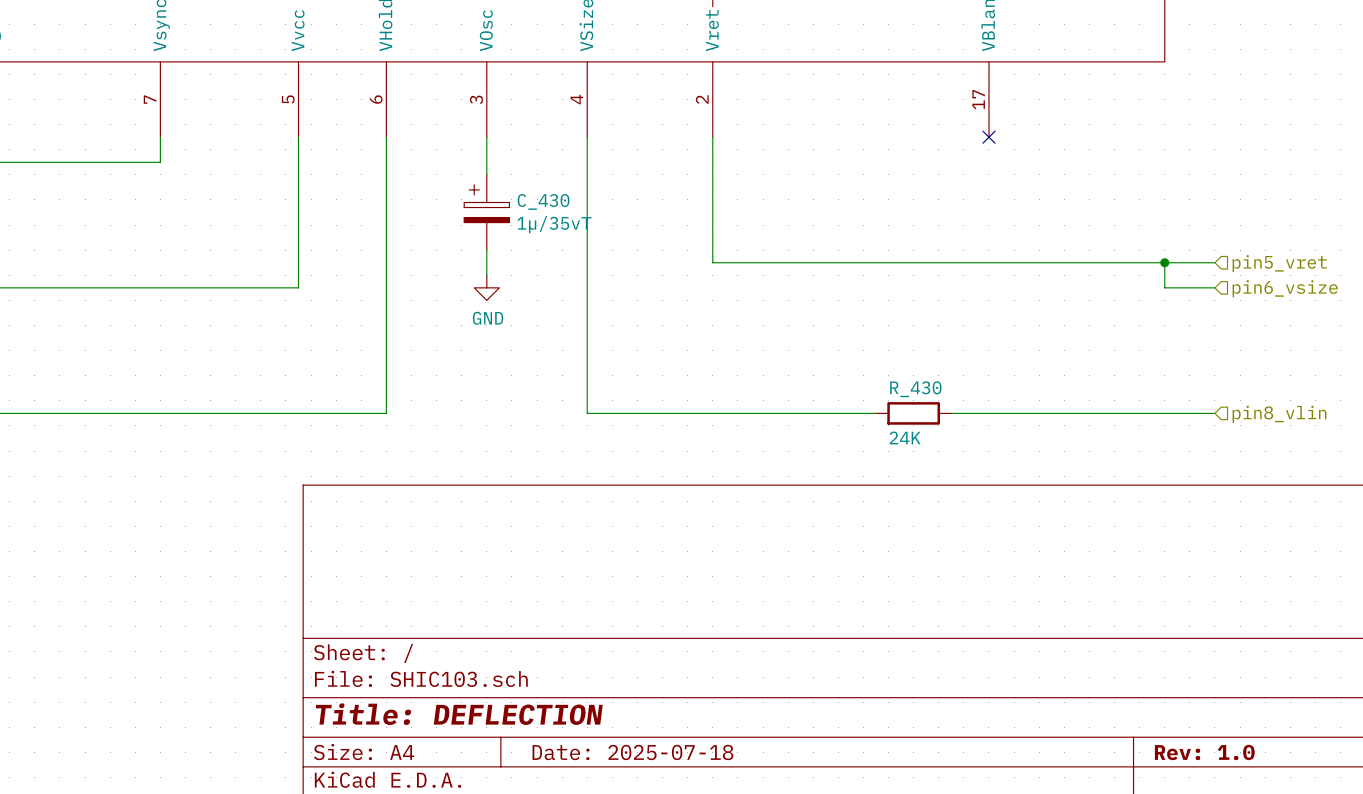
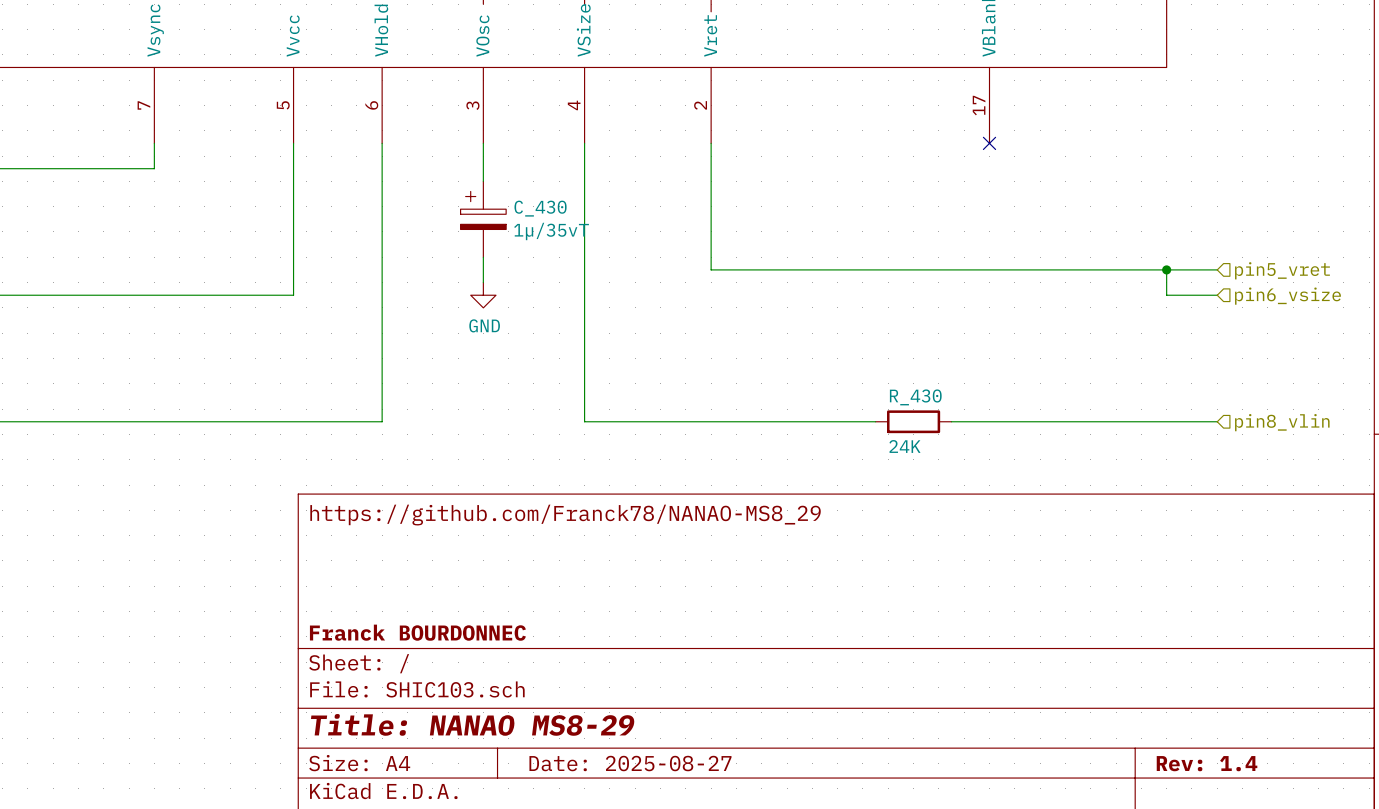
title block: none -> https://github.com/Franck78/NANAO-MS8_29 (565, 515)
title block: none -> Franck BOURDONNEC (417, 632)
title block: Title: DEFLECTION (459, 714) -> Title: NANAO MS8-29 (472, 724)
title block: Date: 2025-07-18 (632, 752) -> Date: 2025-08-27 (630, 763)
title block: Rev: 1.0 (1204, 752) -> Rev: 1.4 (1207, 763)

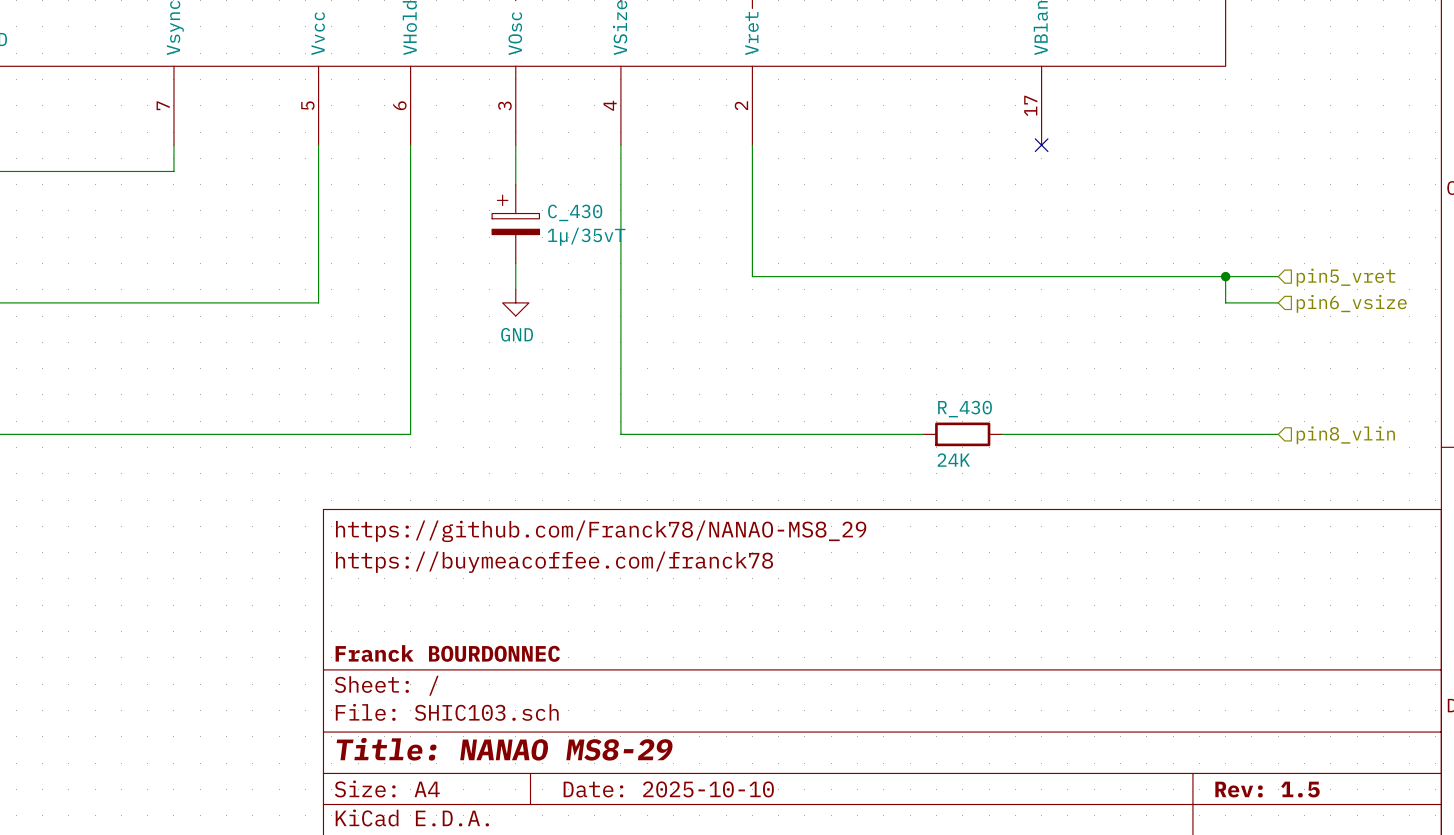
title block: none -> https://buymeacoffee.com/franck78 (554, 562)
title block: Date: 2025-08-27 (630, 763) -> Date: 2025-10-10 (668, 789)
title block: Rev: 1.4 (1207, 763) -> Rev: 1.5 (1267, 789)

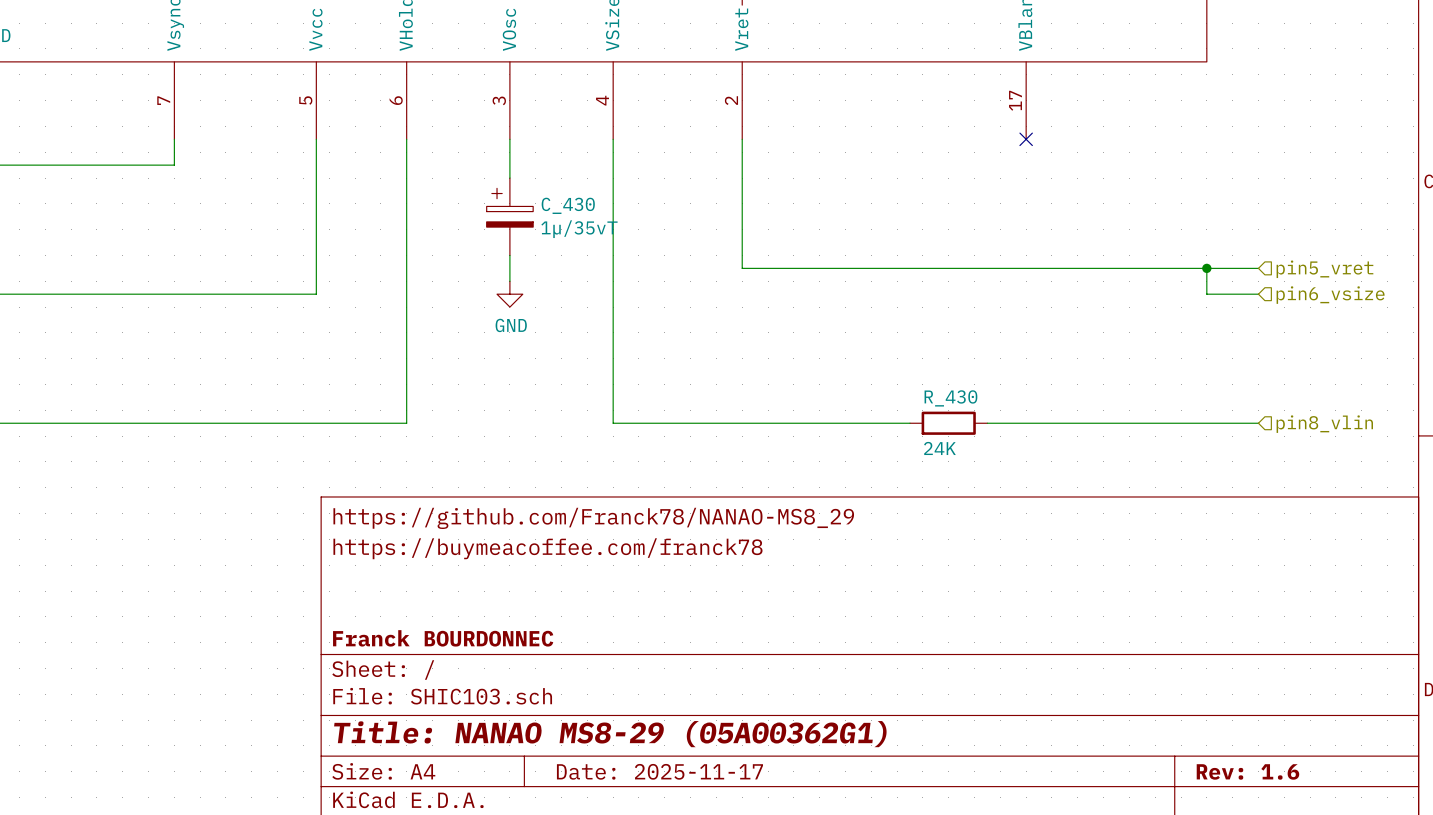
title block: Title: NANAO MS8-29 (504, 749) -> Title: NANAO MS8-29 (05A00362G1) (610, 734)
title block: Date: 2025-10-10 (668, 789) -> Date: 2025-11-17 (659, 771)
title block: Rev: 1.5 (1267, 789) -> Rev: 1.6 (1247, 771)

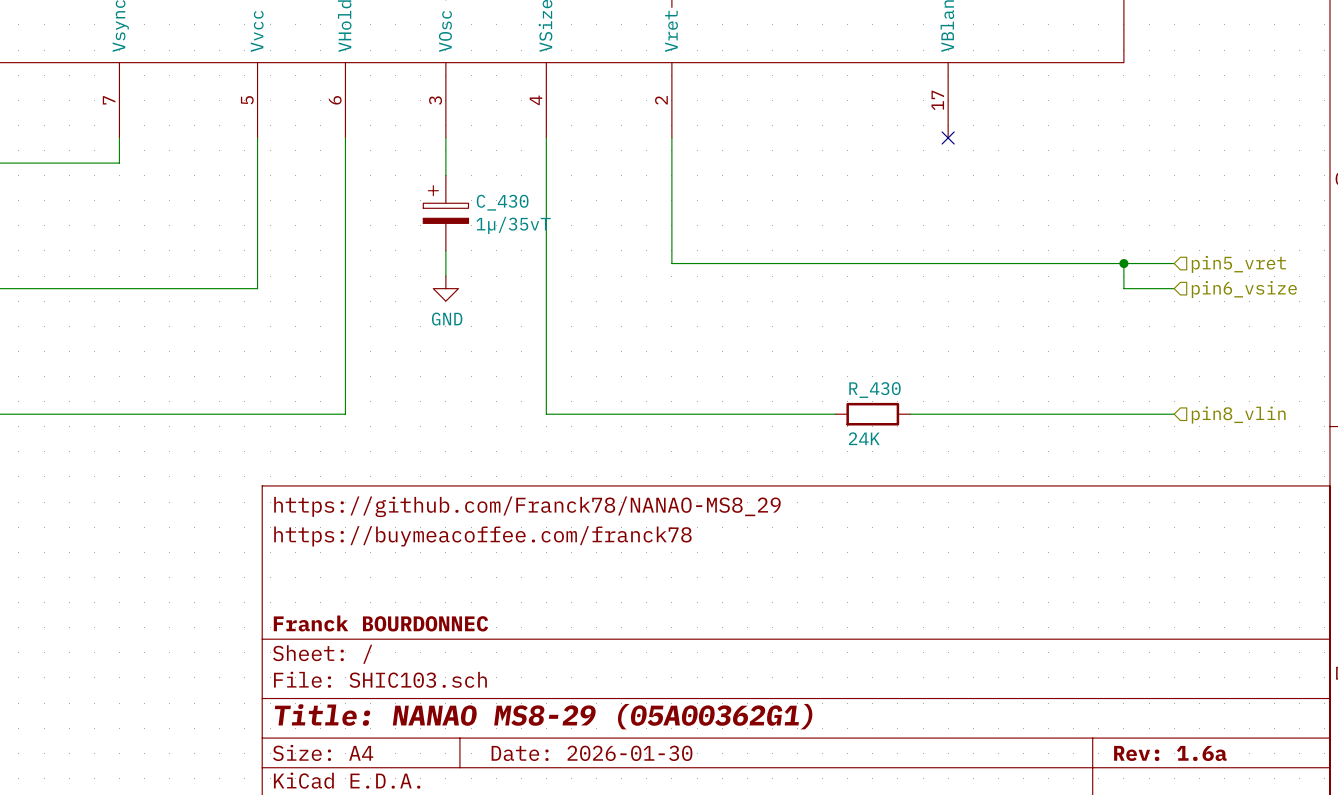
title block: Date: 2025-11-17 (659, 771) -> Date: 2026-01-30 (592, 753)
title block: Rev: 1.6 (1247, 771) -> Rev: 1.6a (1170, 753)

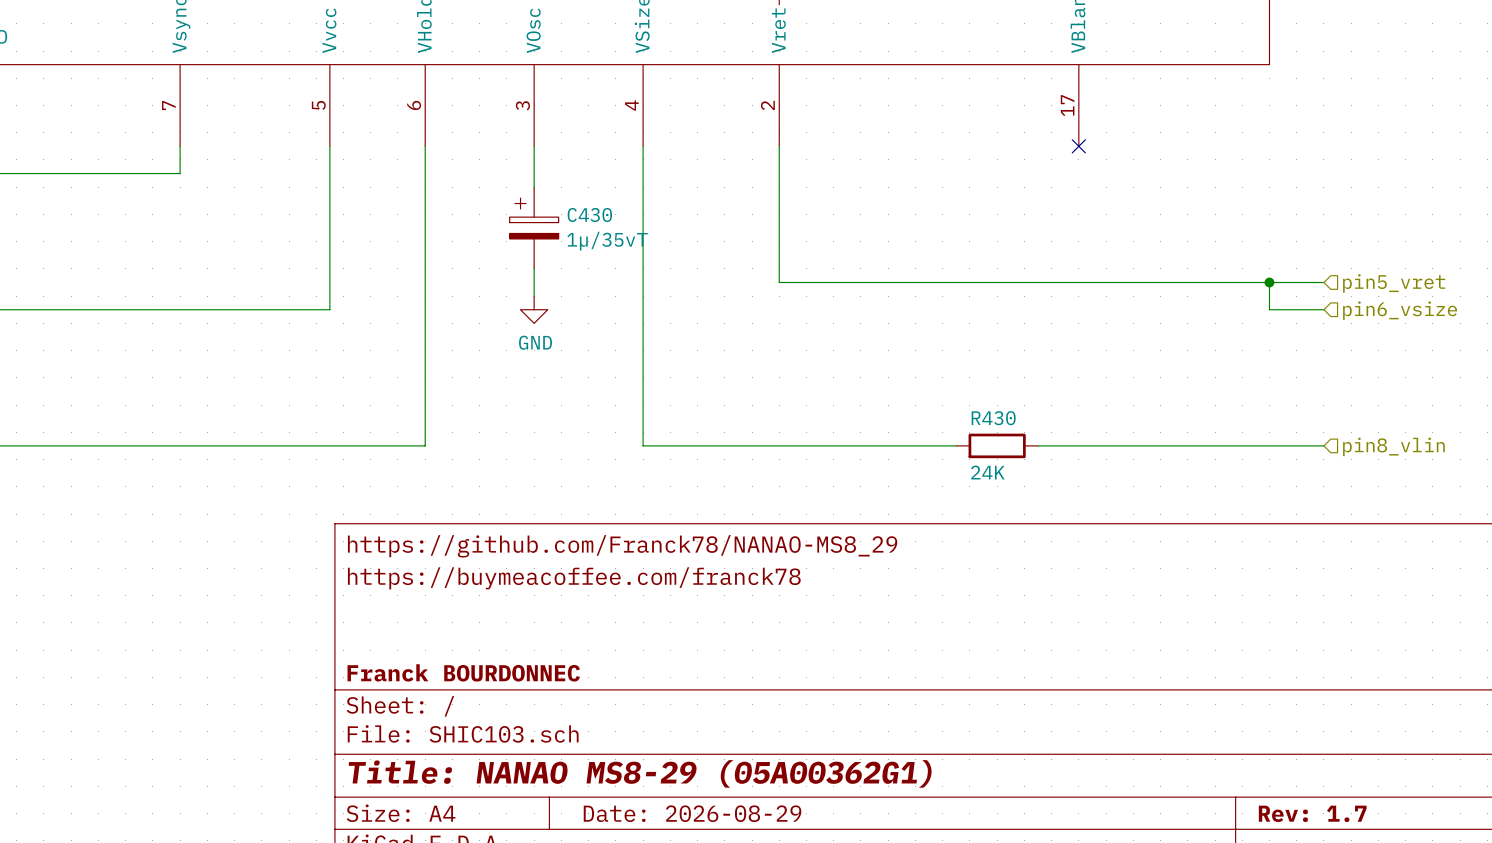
C_430 name: C_430 (502, 202) -> C430 (589, 214)
R_430 name: R_430 (874, 390) -> R430 (993, 418)
title block: Date: 2026-01-30 (592, 753) -> Date: 2026-08-29 (692, 813)
title block: Rev: 1.6a (1170, 753) -> Rev: 1.7 (1312, 813)

